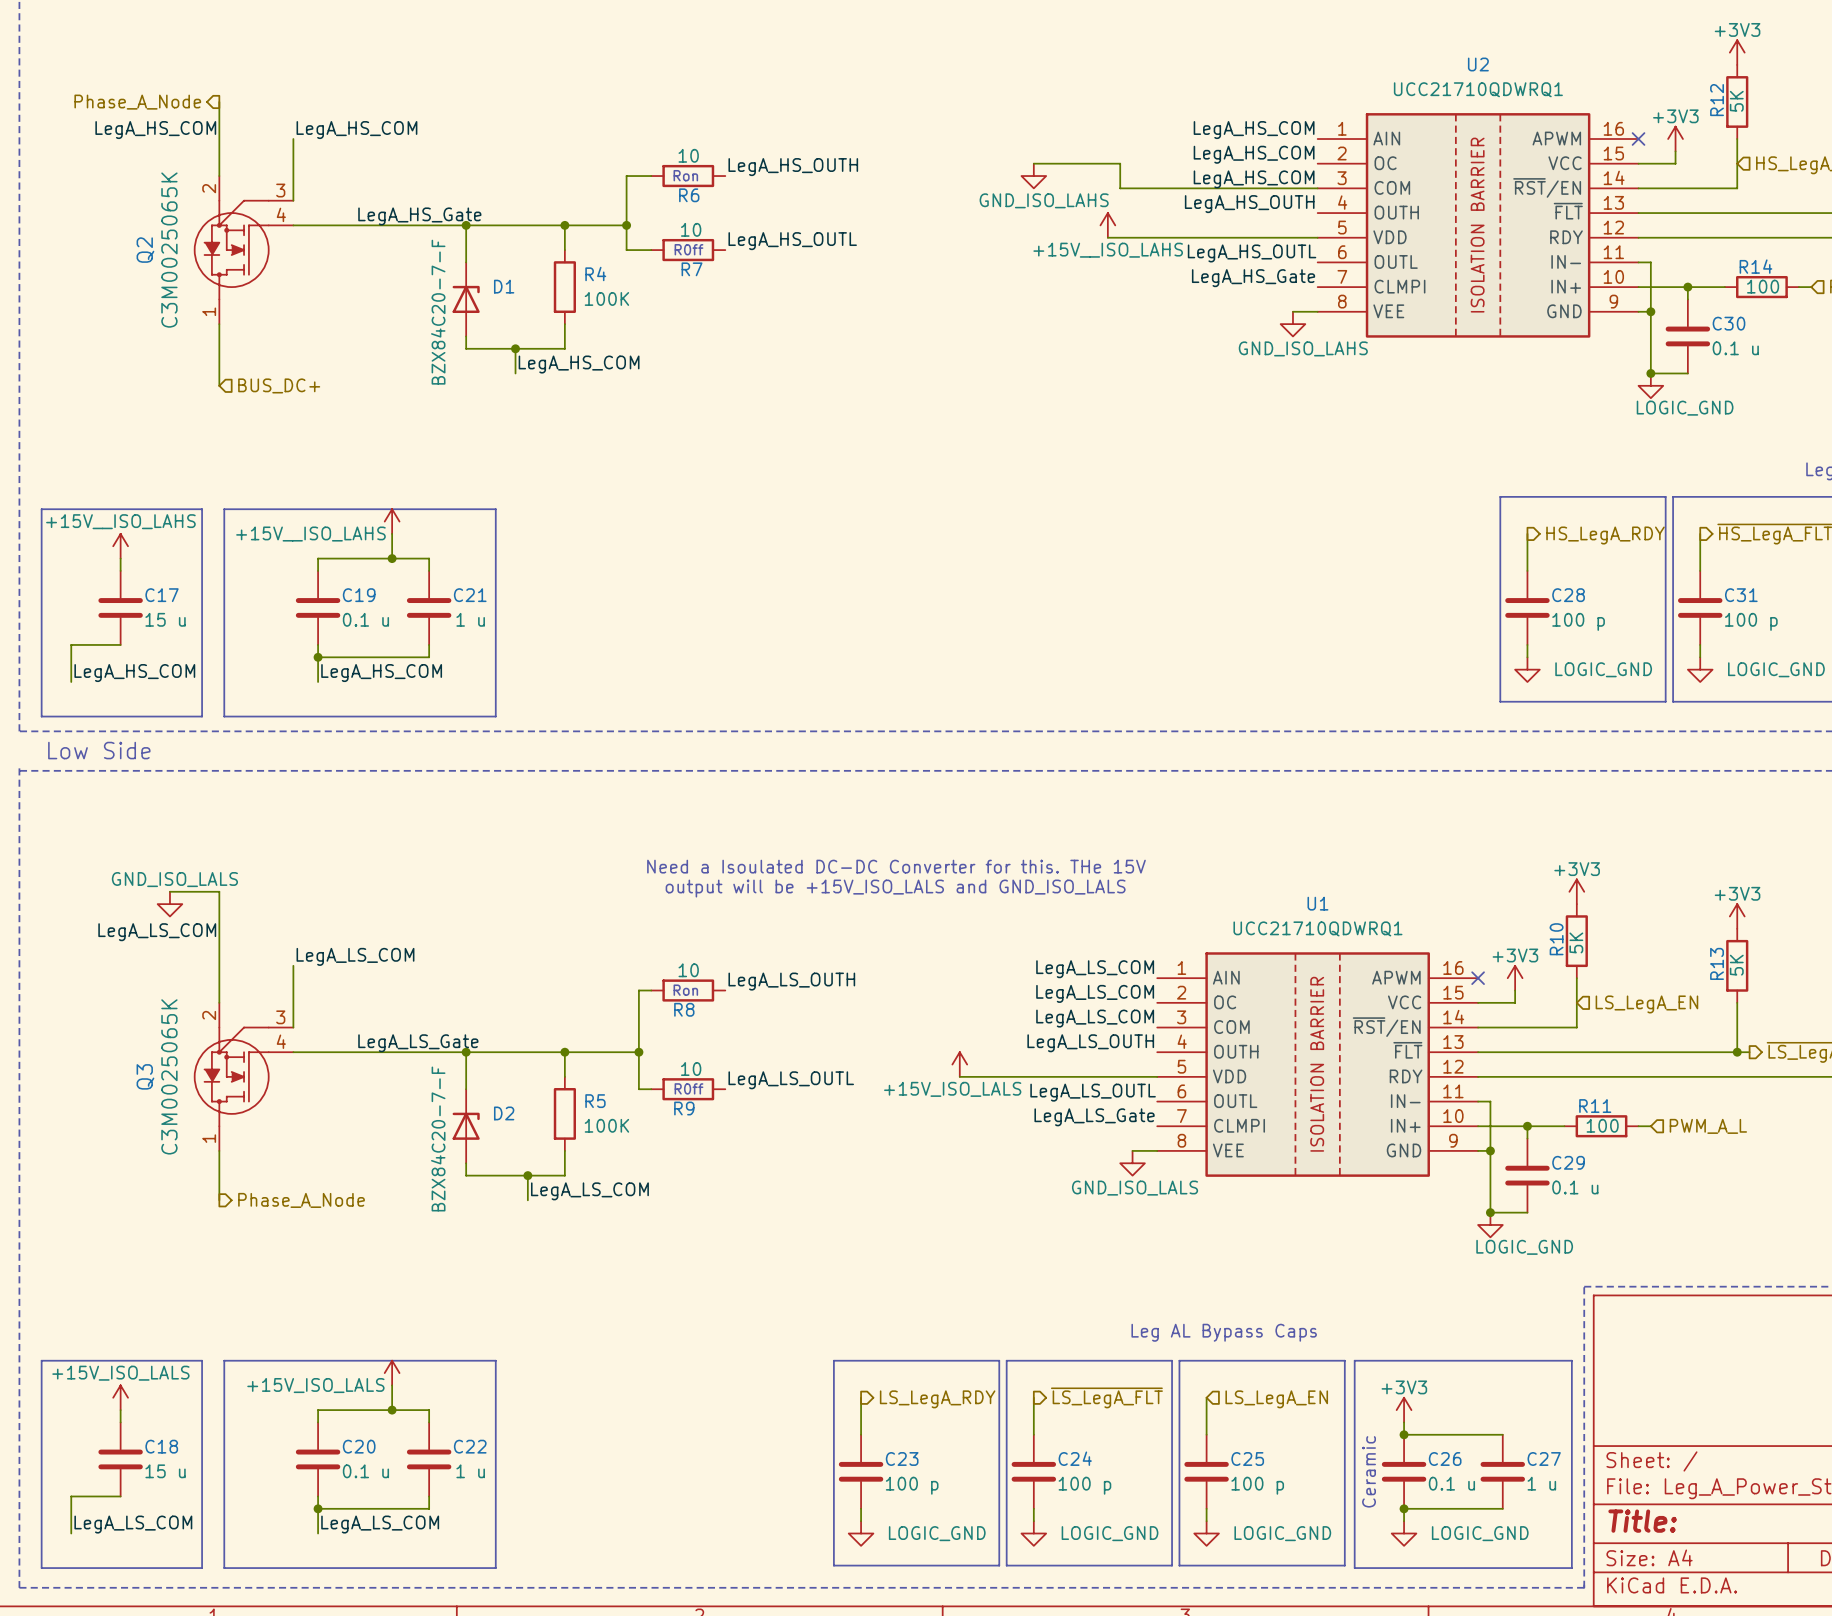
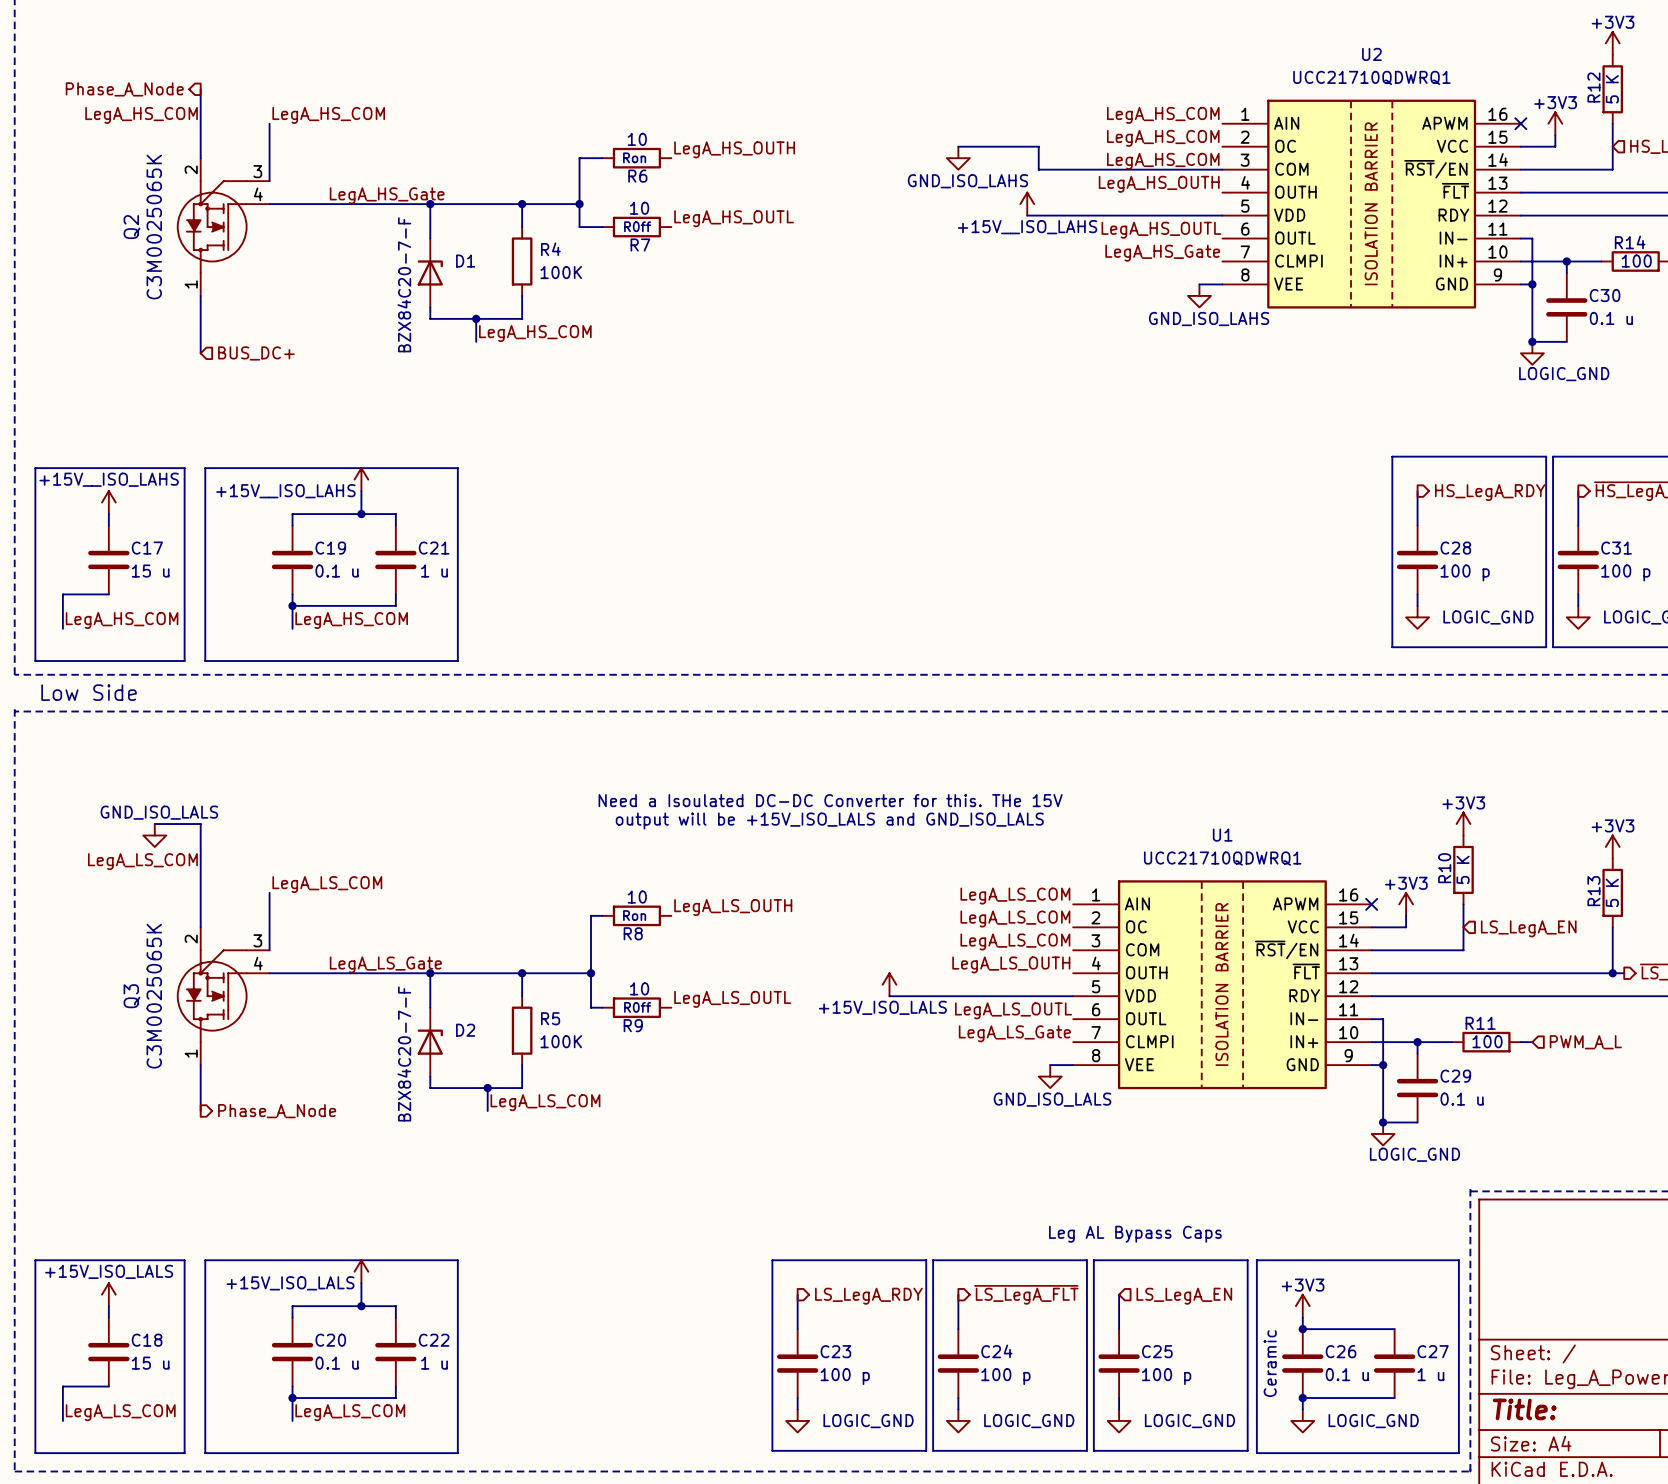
R12 value: 5K (1736, 101) -> 5 K (1612, 89)
R10 value: 5K (1576, 942) -> 5 K (1463, 869)
R13 value: 5K (1736, 965) -> 5 K (1612, 892)

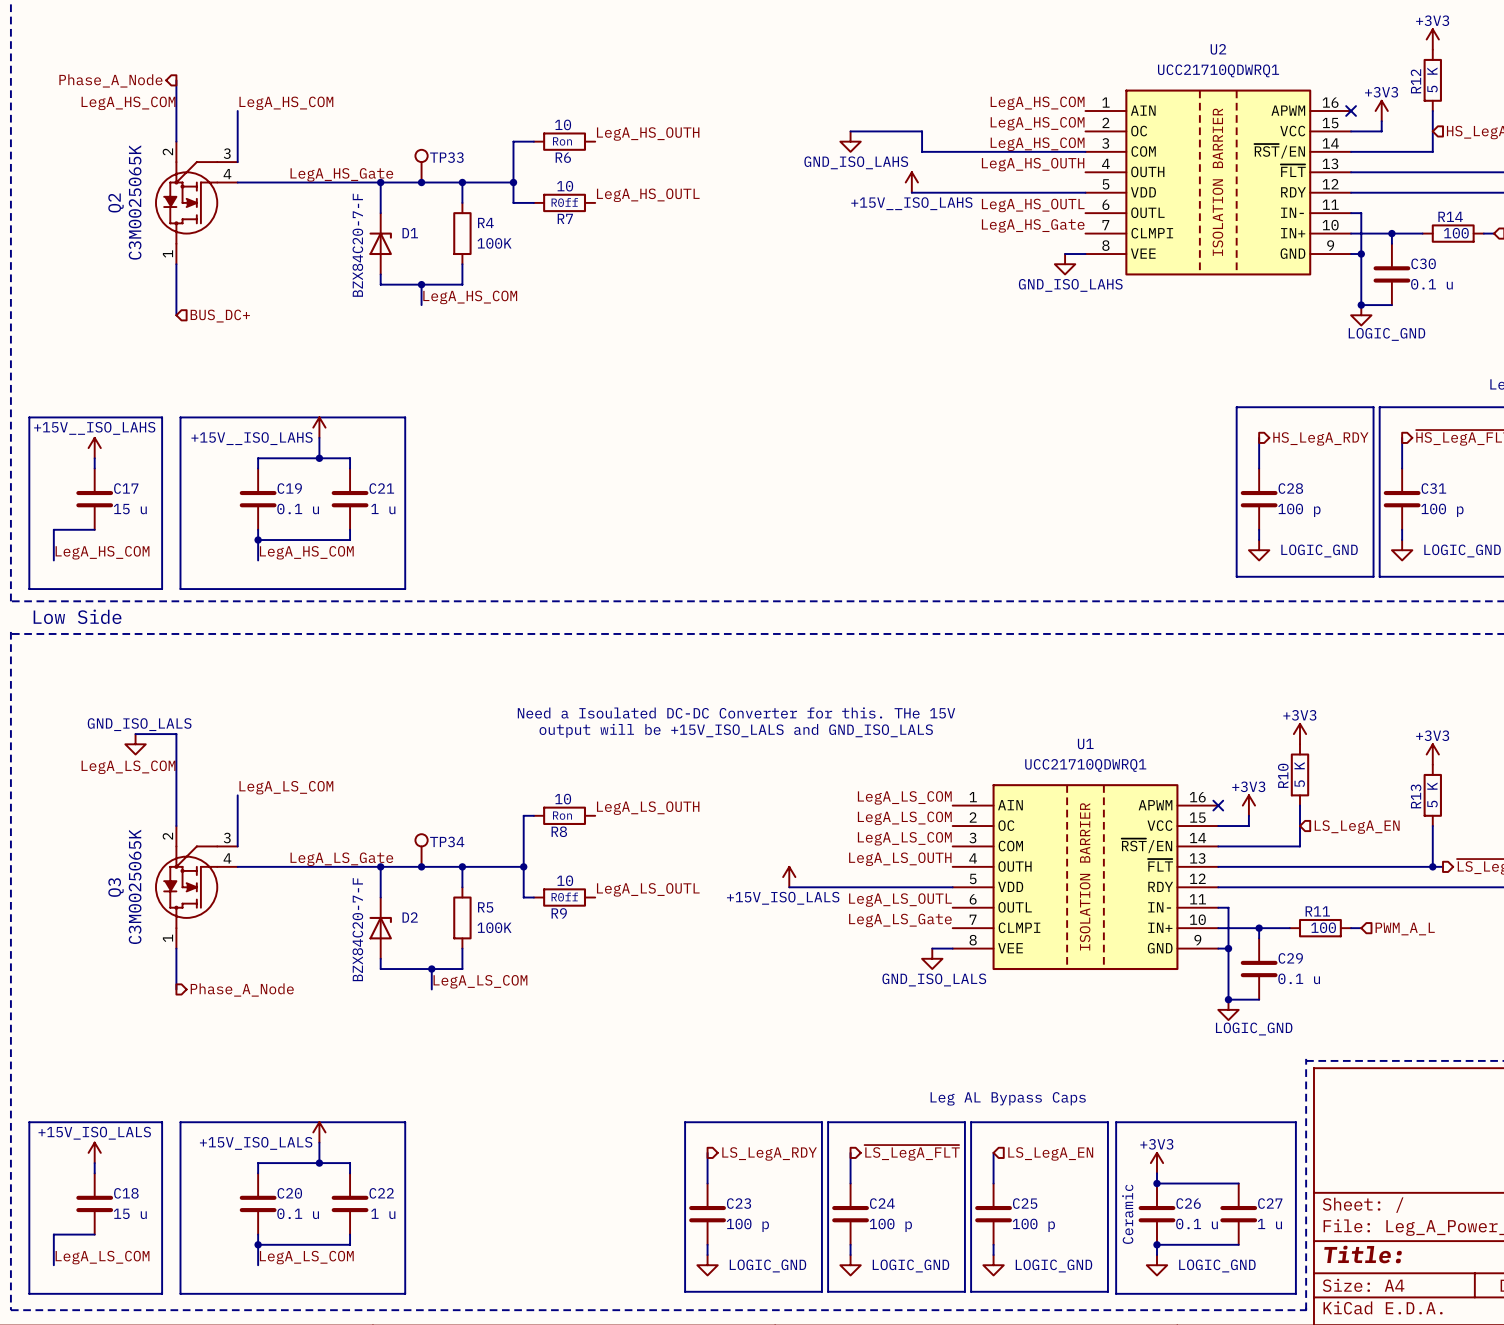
TP33: none -> (421, 166)
junction: none -> (421, 182)
TP34: none -> (421, 850)
junction: none -> (421, 866)

